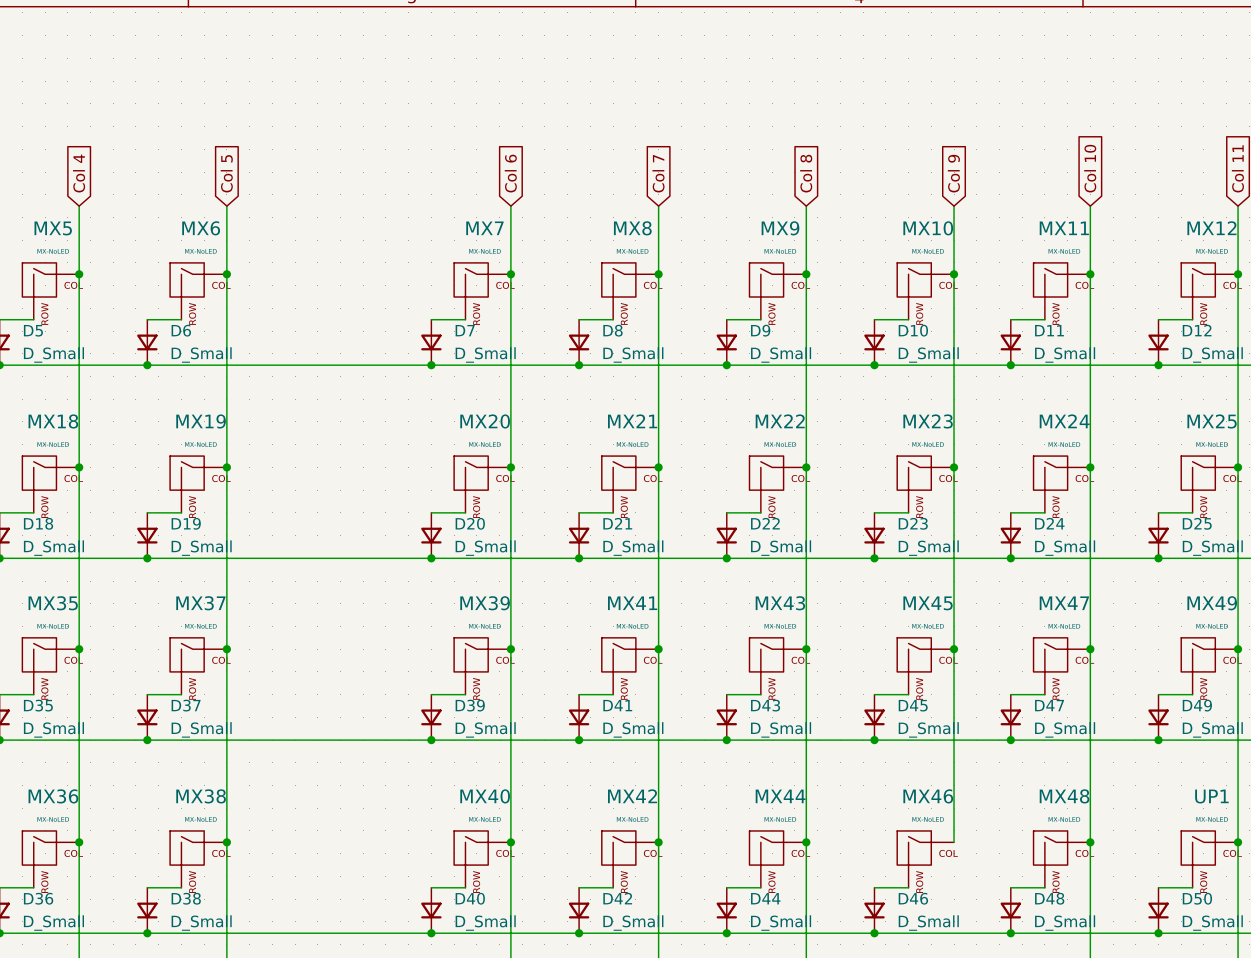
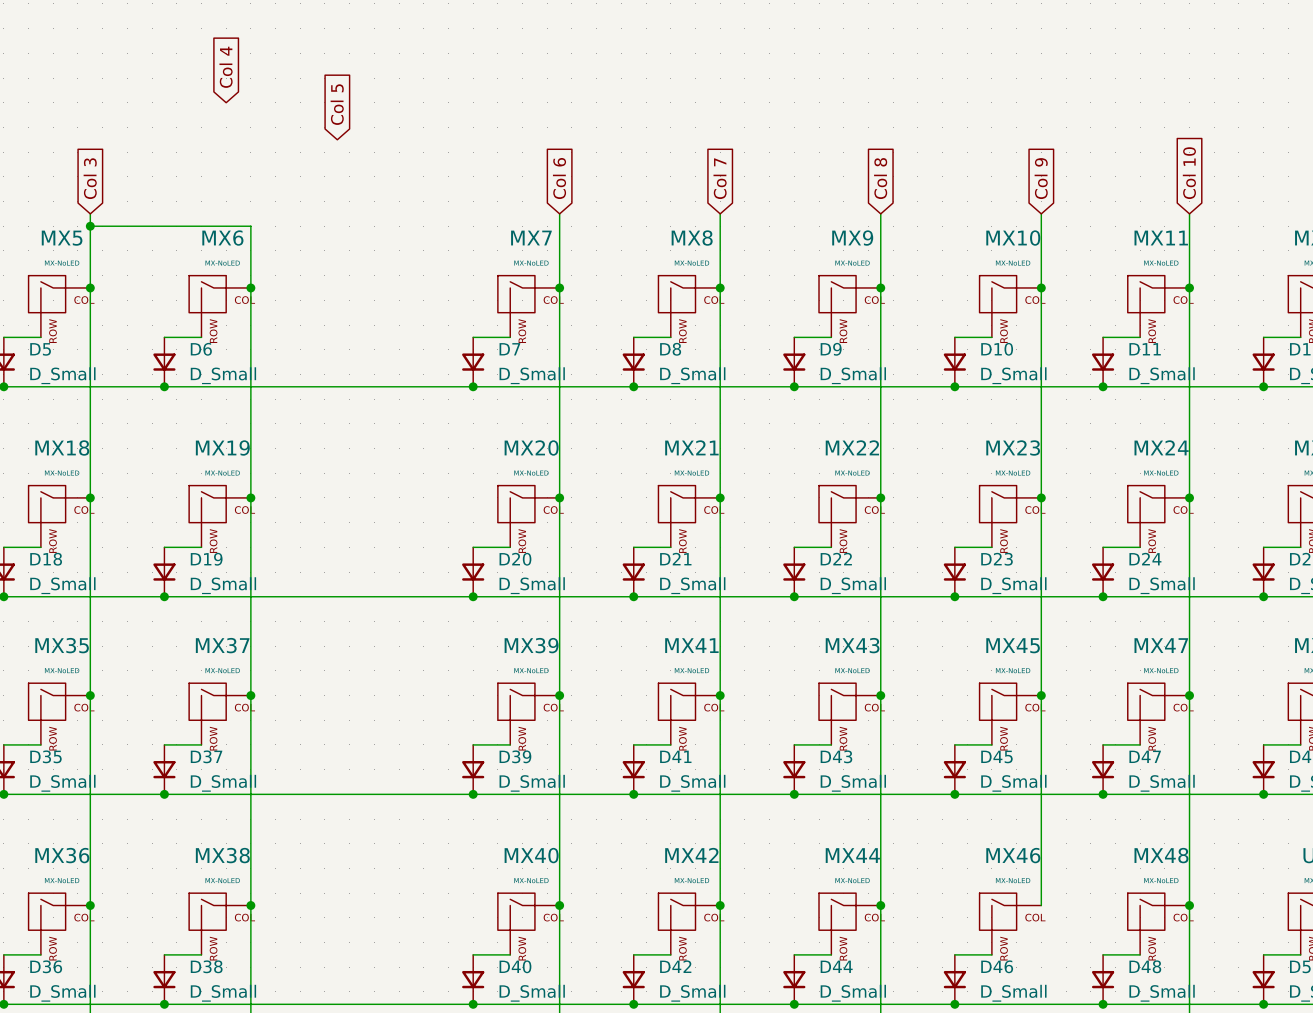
global label: none -> Col 4 (226, 67)
global label: Col 4 (79, 173) -> Col 3 (90, 178)
global label position: Col 5 (226, 173) -> Col 5 (337, 104)
wire: (226, 206) (226, 217) -> (90, 226) (250, 226)
junction: none -> (90, 226)

